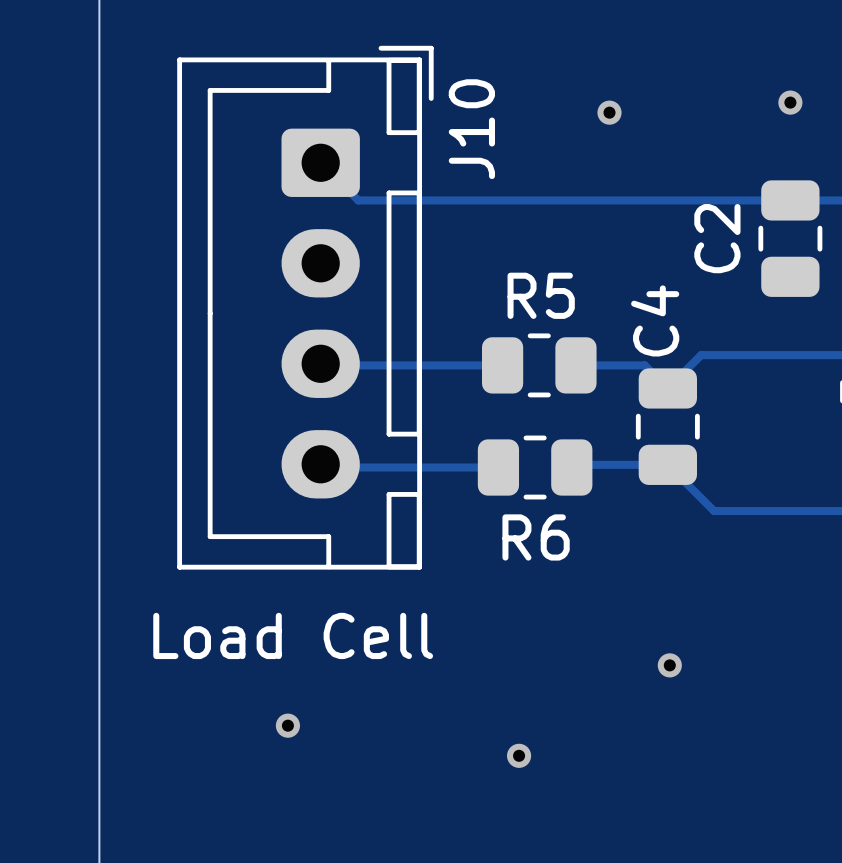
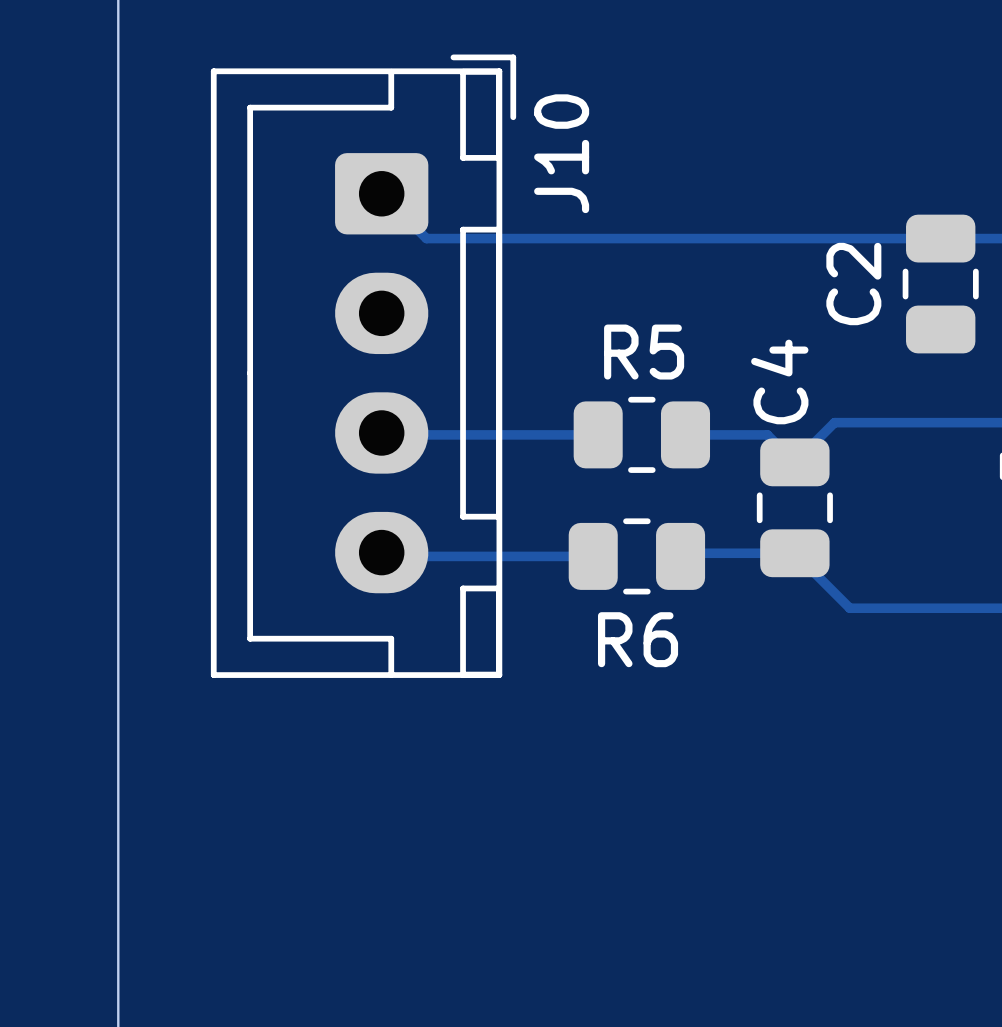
via: (790, 102) -> none
via: (609, 112) -> none
J10 value: Load Cell (293, 635) -> none
via: (669, 665) -> none
via: (287, 725) -> none
via: (519, 755) -> none

